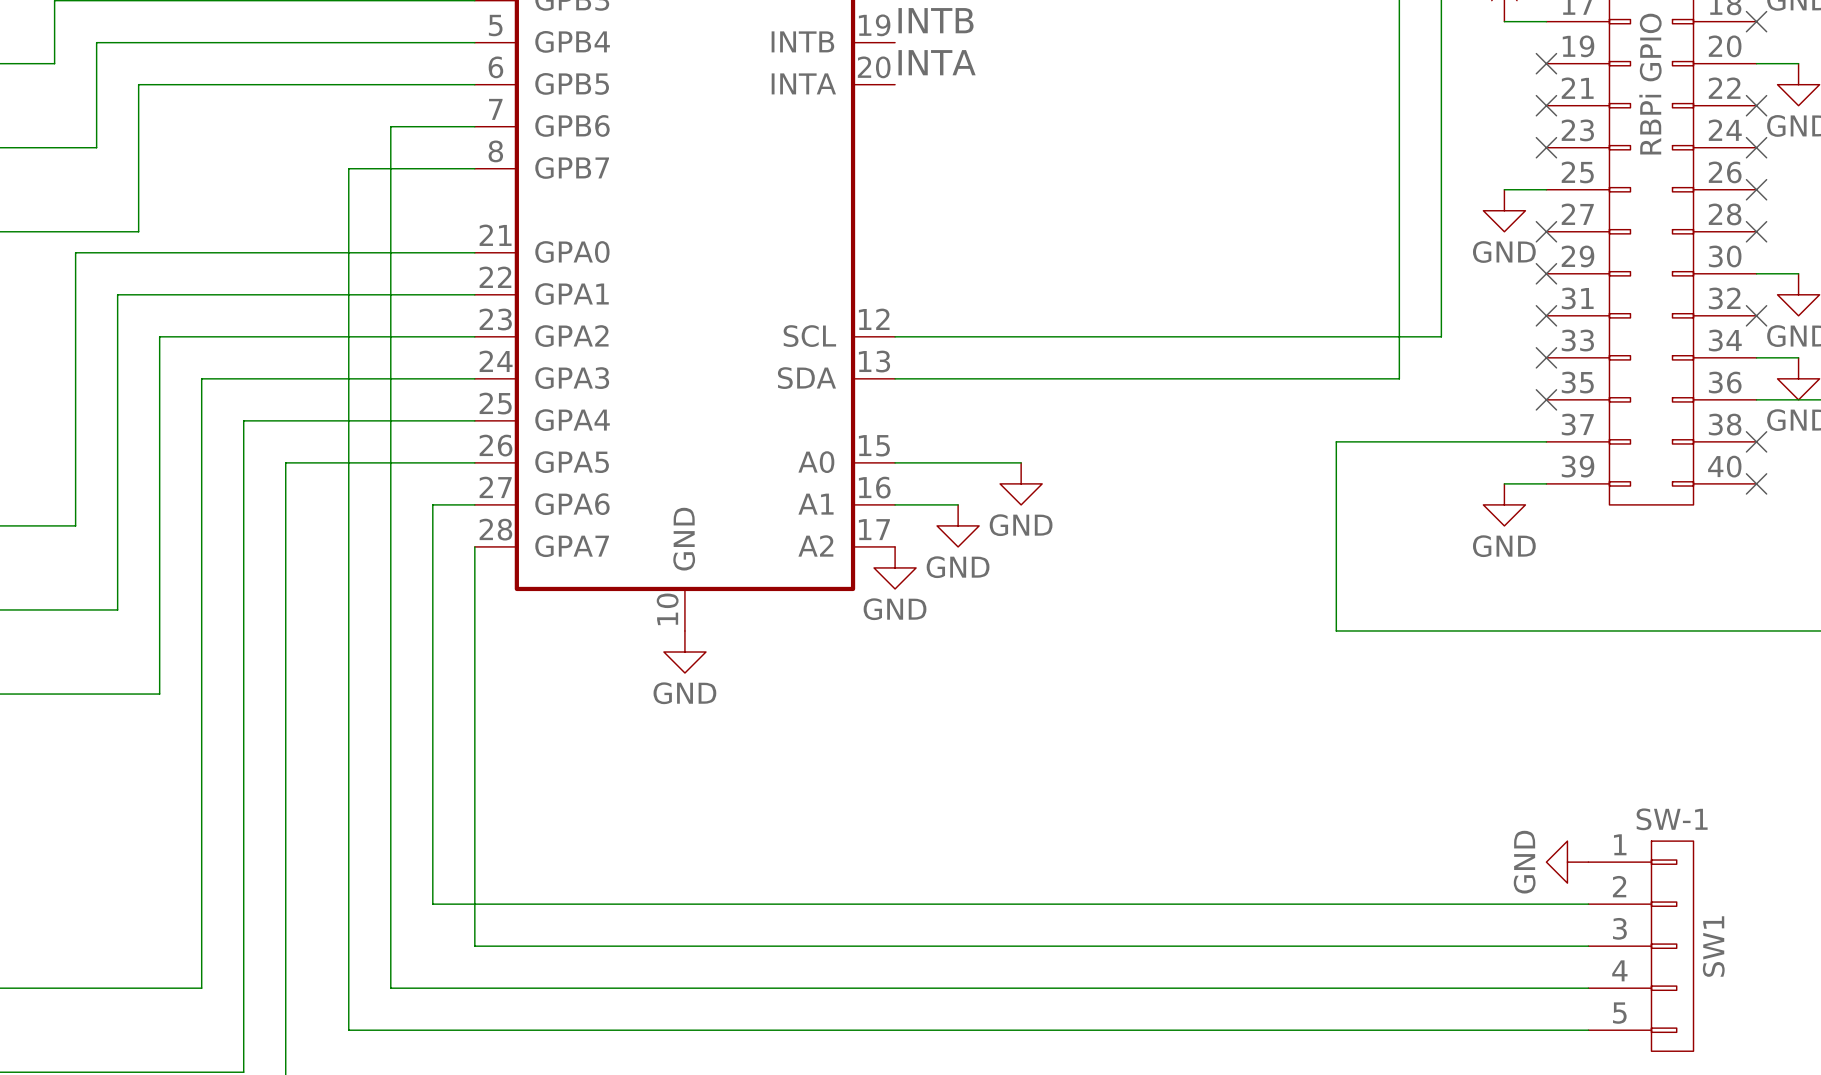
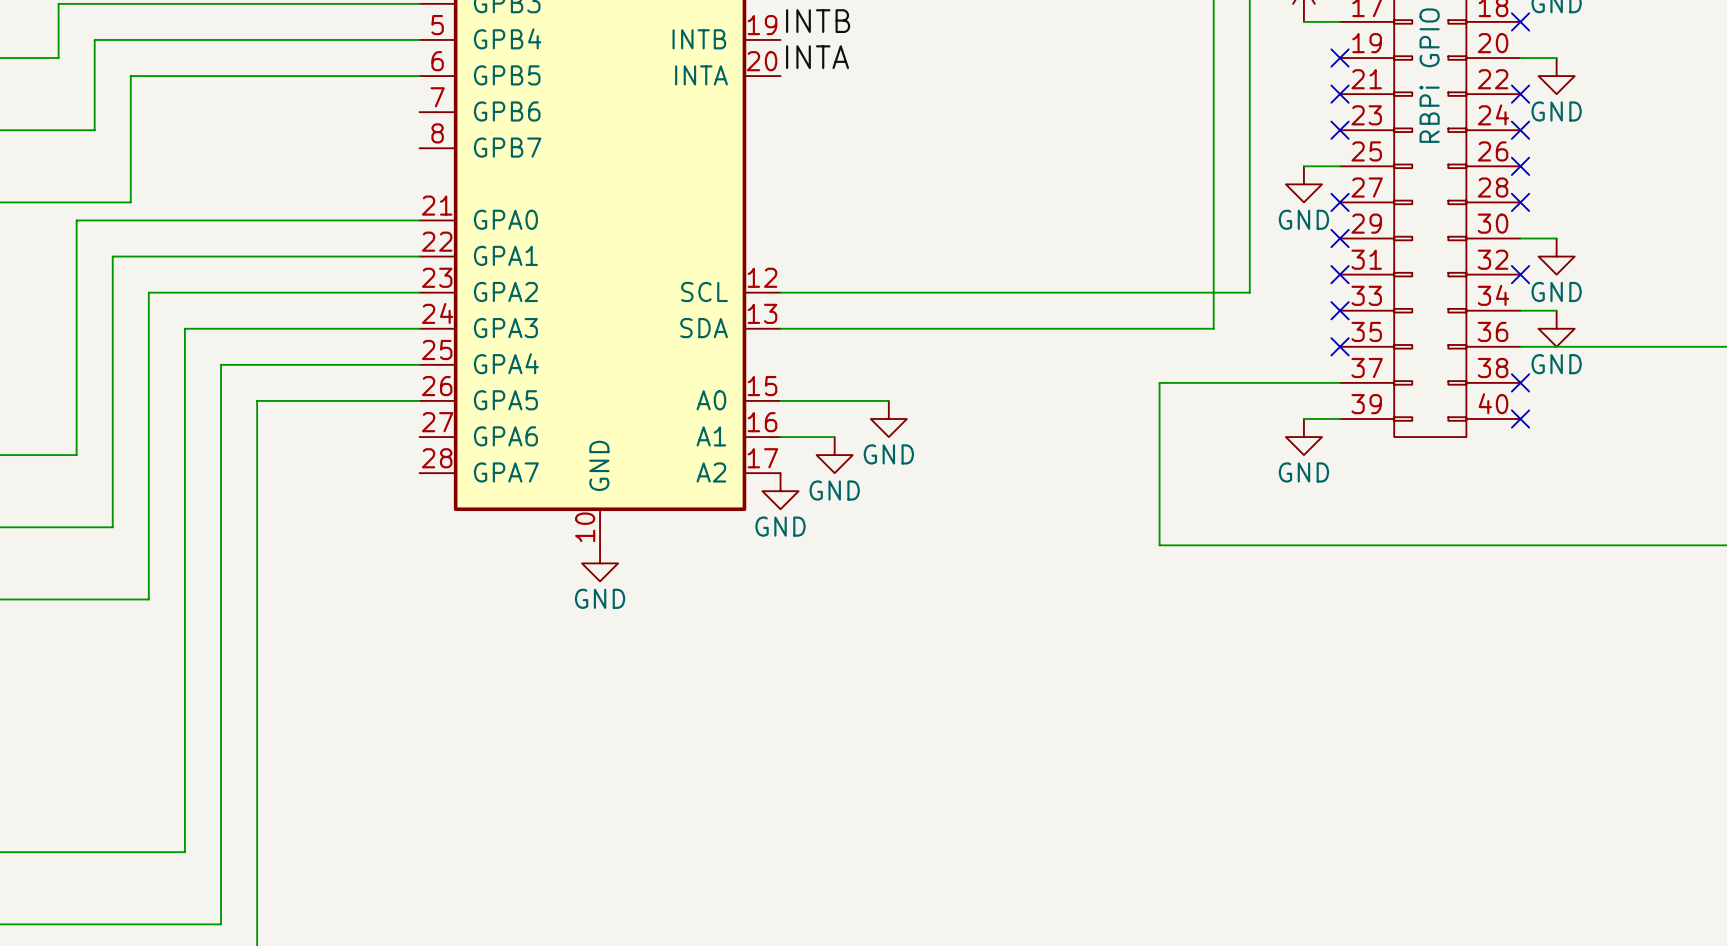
wire: (474, 126) (390, 126) (390, 988) (1588, 988) -> none
wire: (474, 168) (348, 168) (348, 1030) (1588, 1030) -> none
wire: (474, 504) (432, 504) (432, 904) (1588, 904) -> none
wire: (474, 546) (474, 946) (1588, 946) -> none
power symbol: GND (1567, 862) -> none
SW-1: SW1 (1640, 946) -> none

